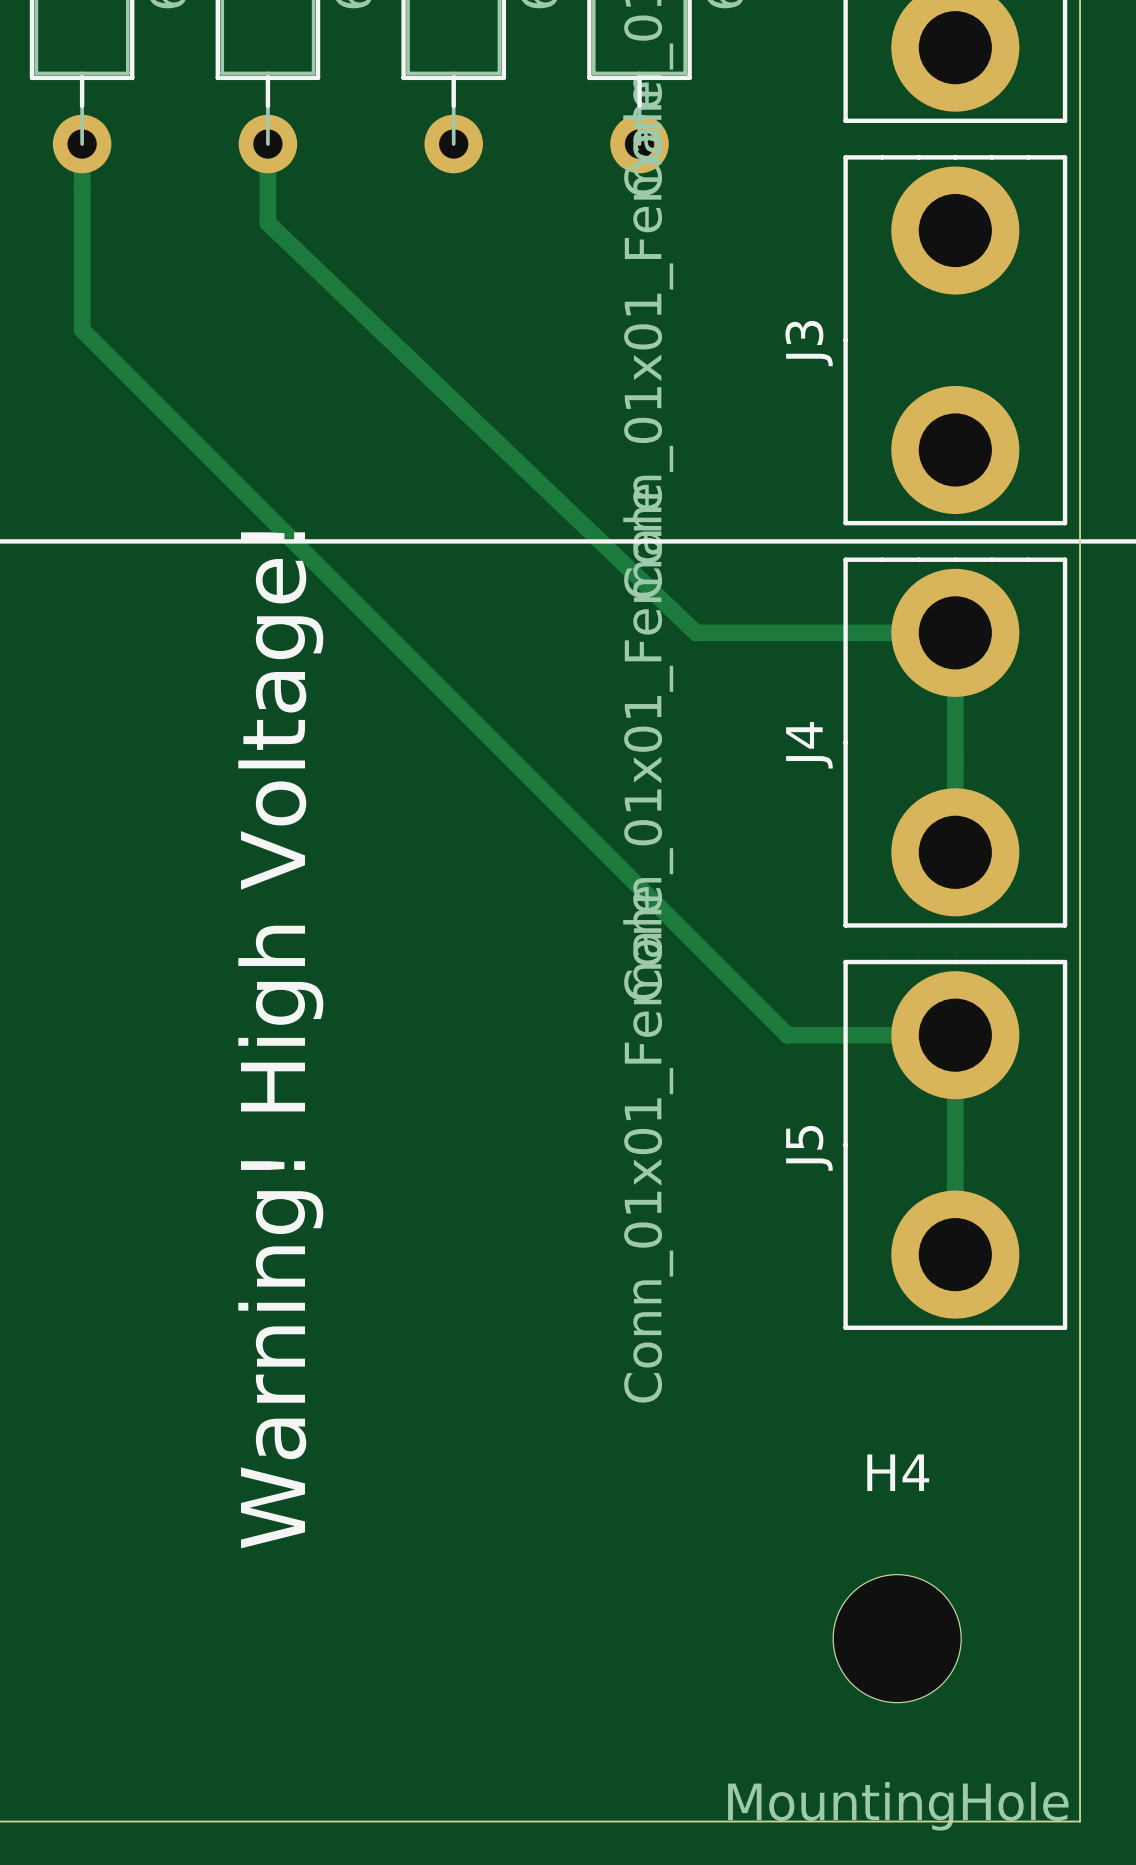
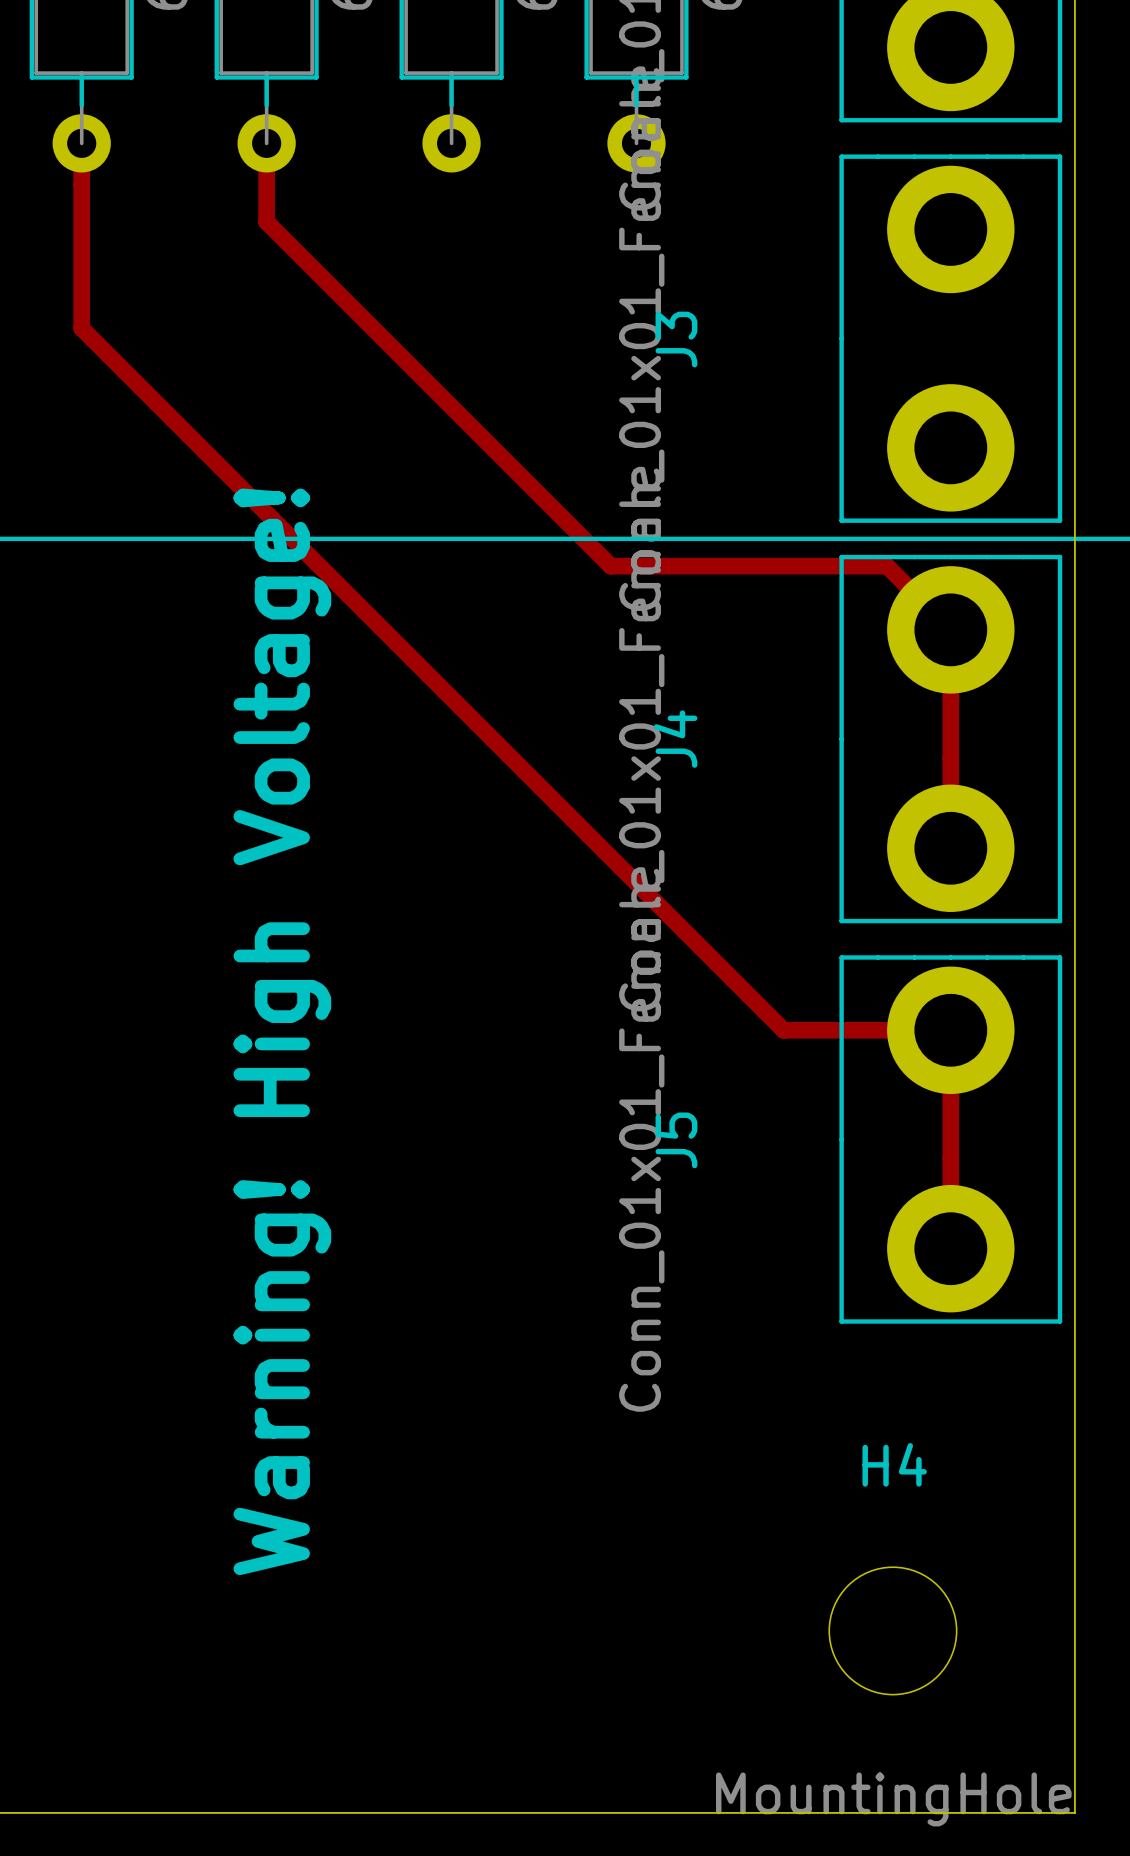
track: (267, 223) (696, 632) (955, 632) -> (266, 221) (610, 566) (887, 566) (950, 629)
J3 name position: J3 (809, 343) -> J3 (676, 339)
J4 name position: J4 (809, 745) -> J4 (675, 739)
J5 name position: J5 (809, 1148) -> J5 (676, 1140)

